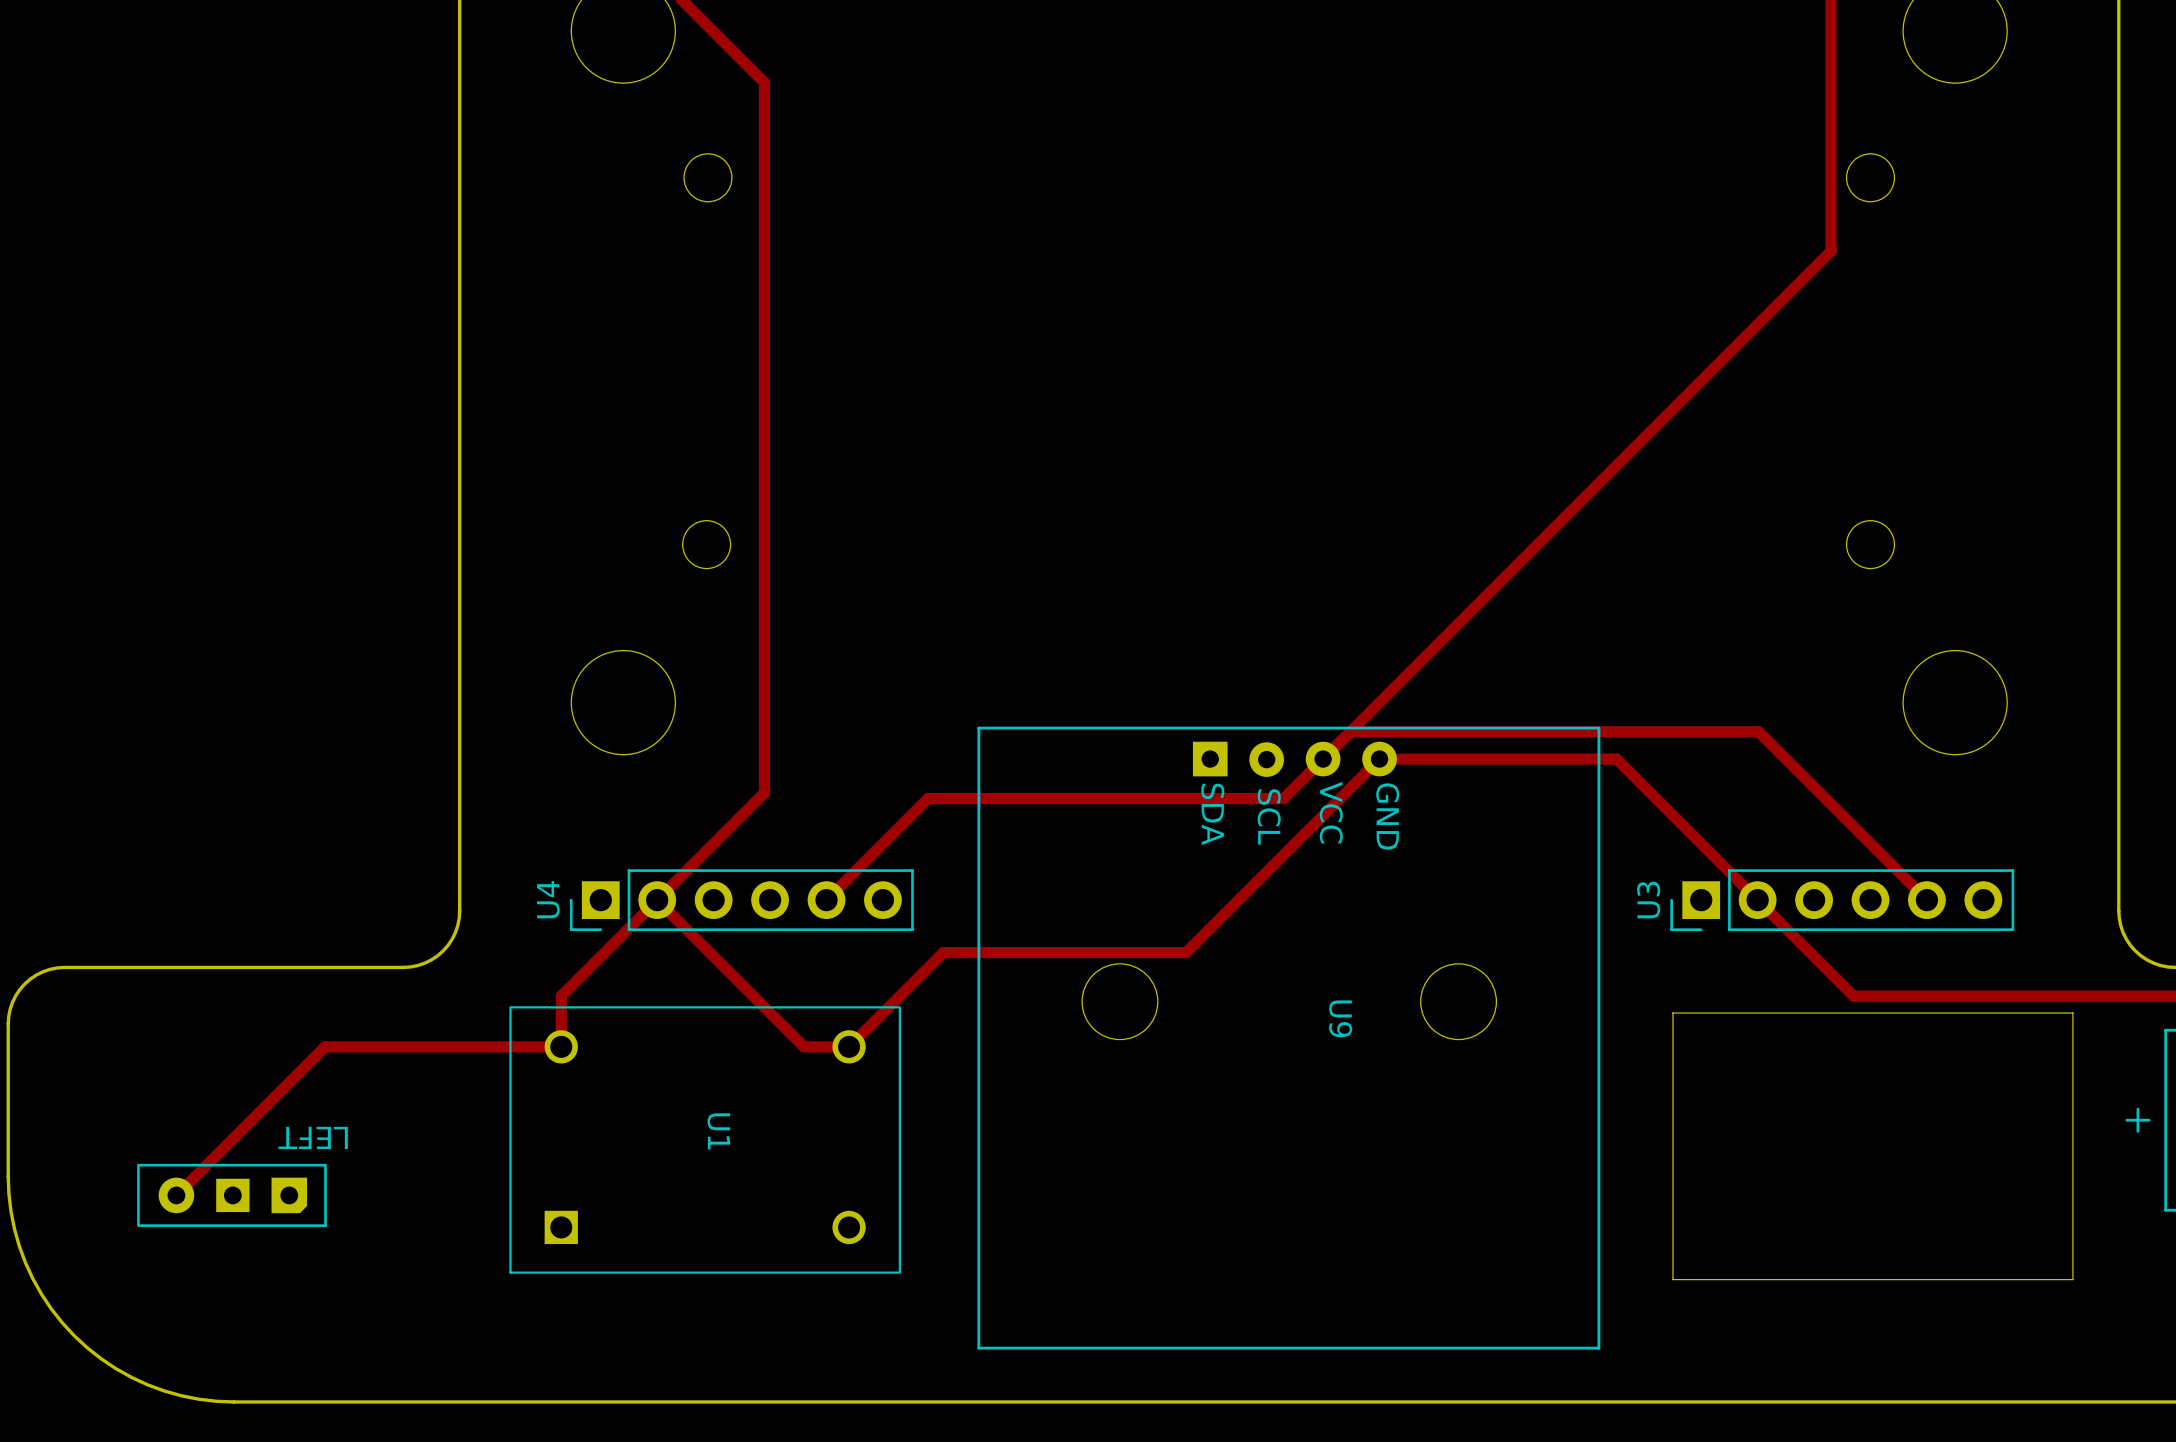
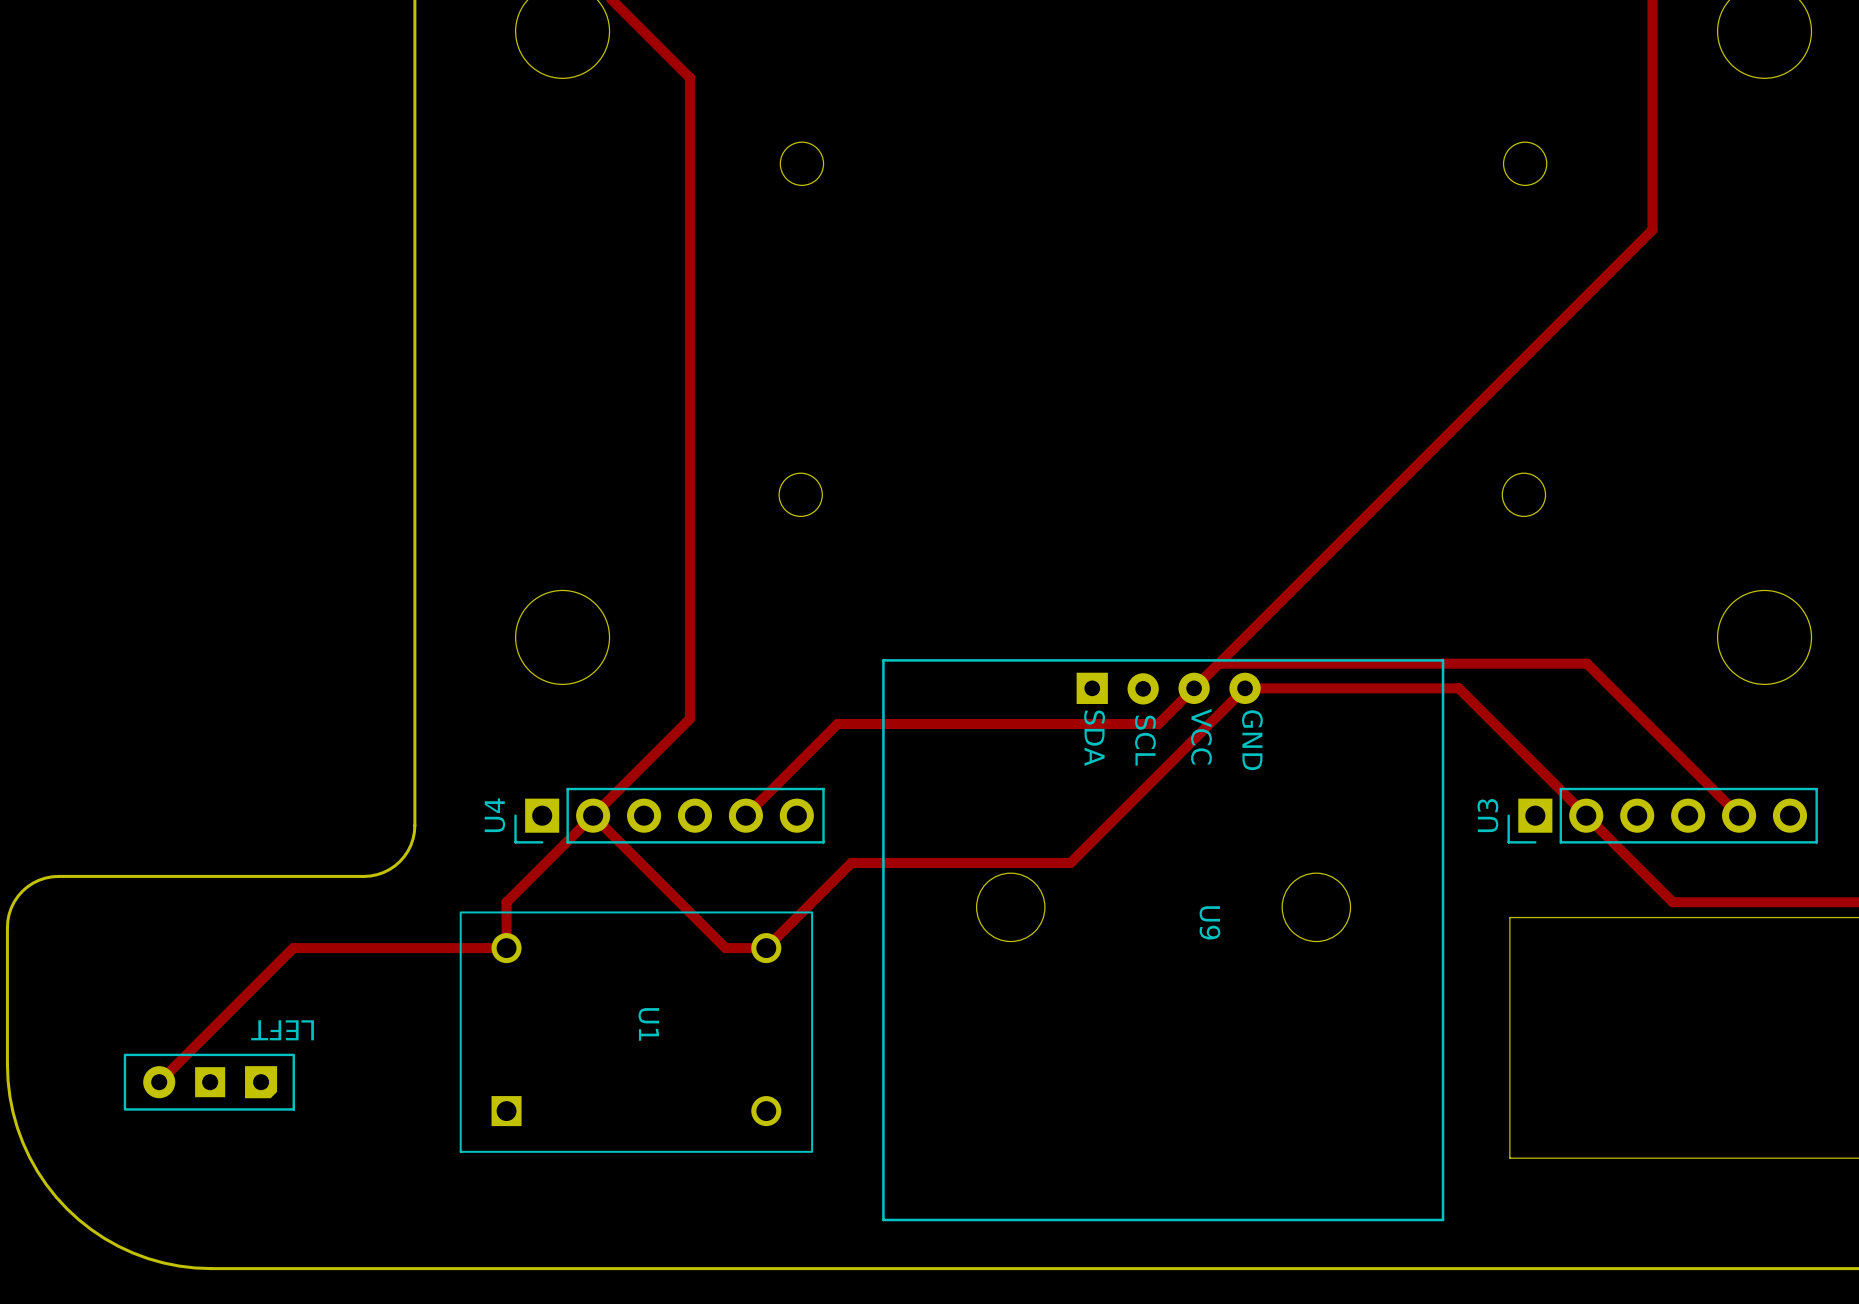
round board edge position: (707, 177) -> (801, 163)
round board edge position: (1870, 177) -> (1525, 163)
round board edge position: (706, 544) -> (800, 494)
round board edge position: (1870, 544) -> (1523, 494)

